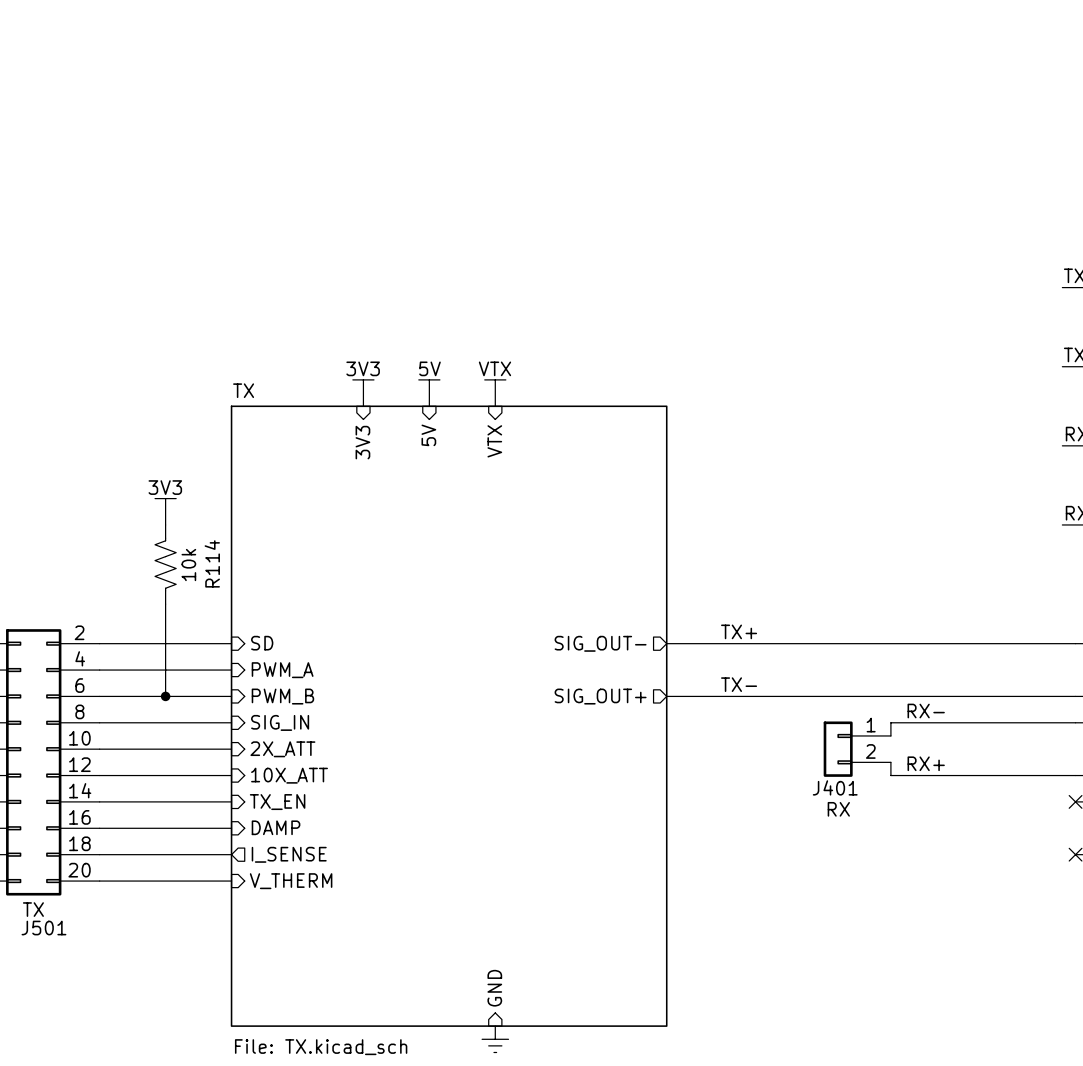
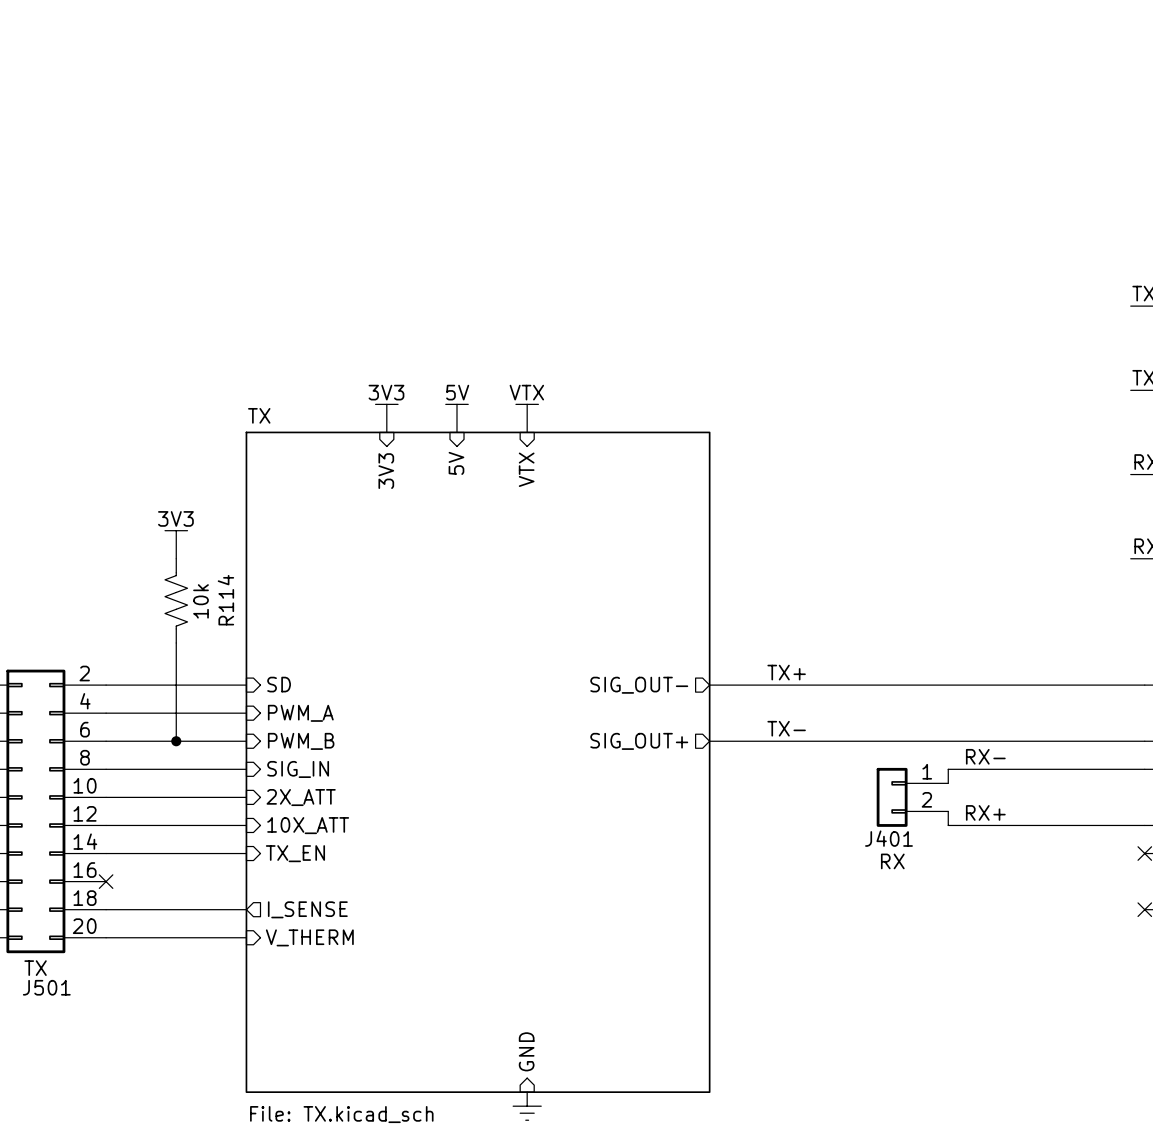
sheet pin: DAMP (276, 827) -> none
wire: (99, 828) (231, 828) -> none
no-connect mark: none -> (106, 881)

